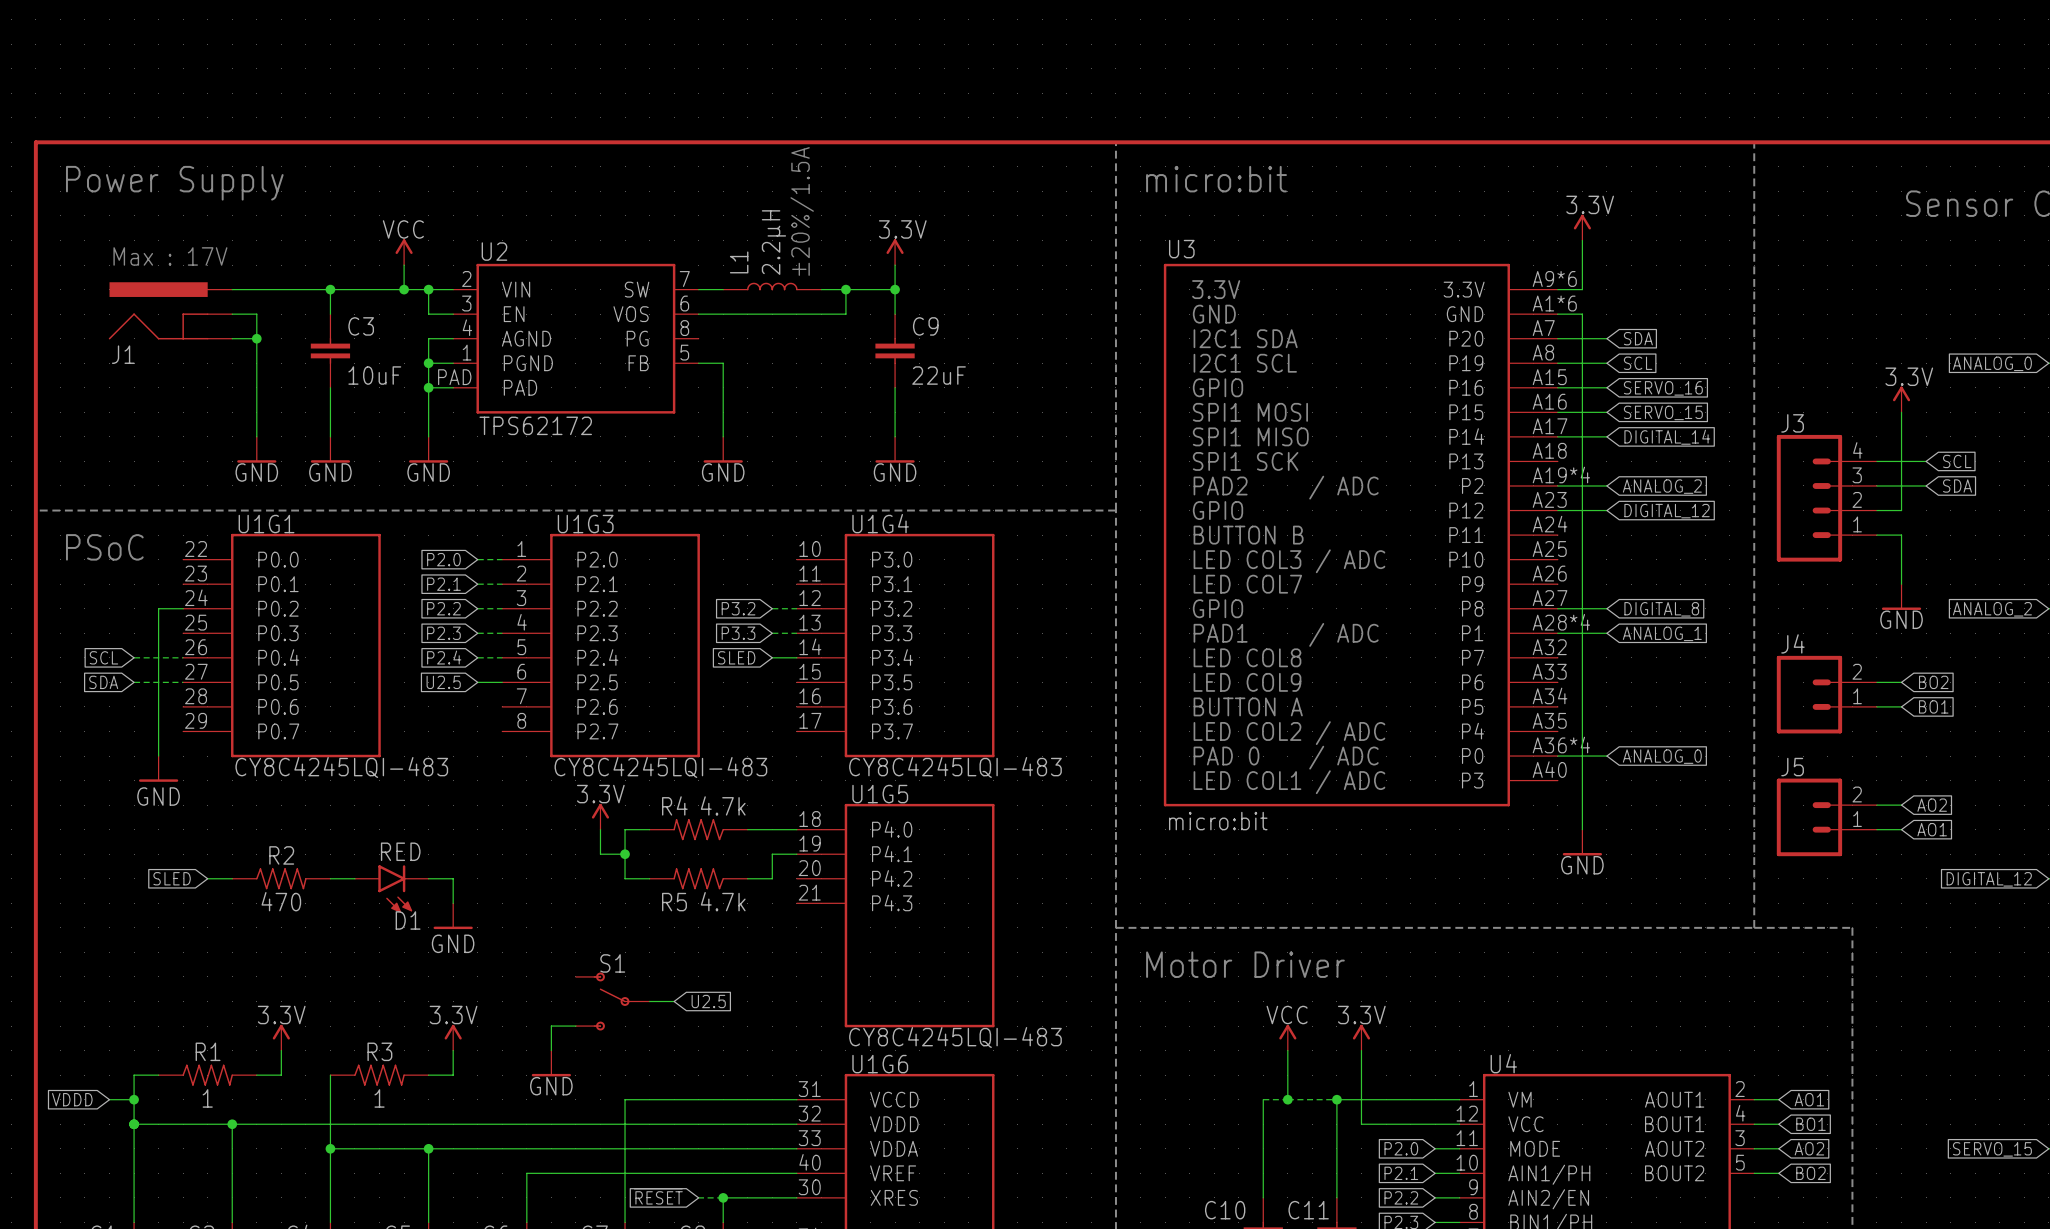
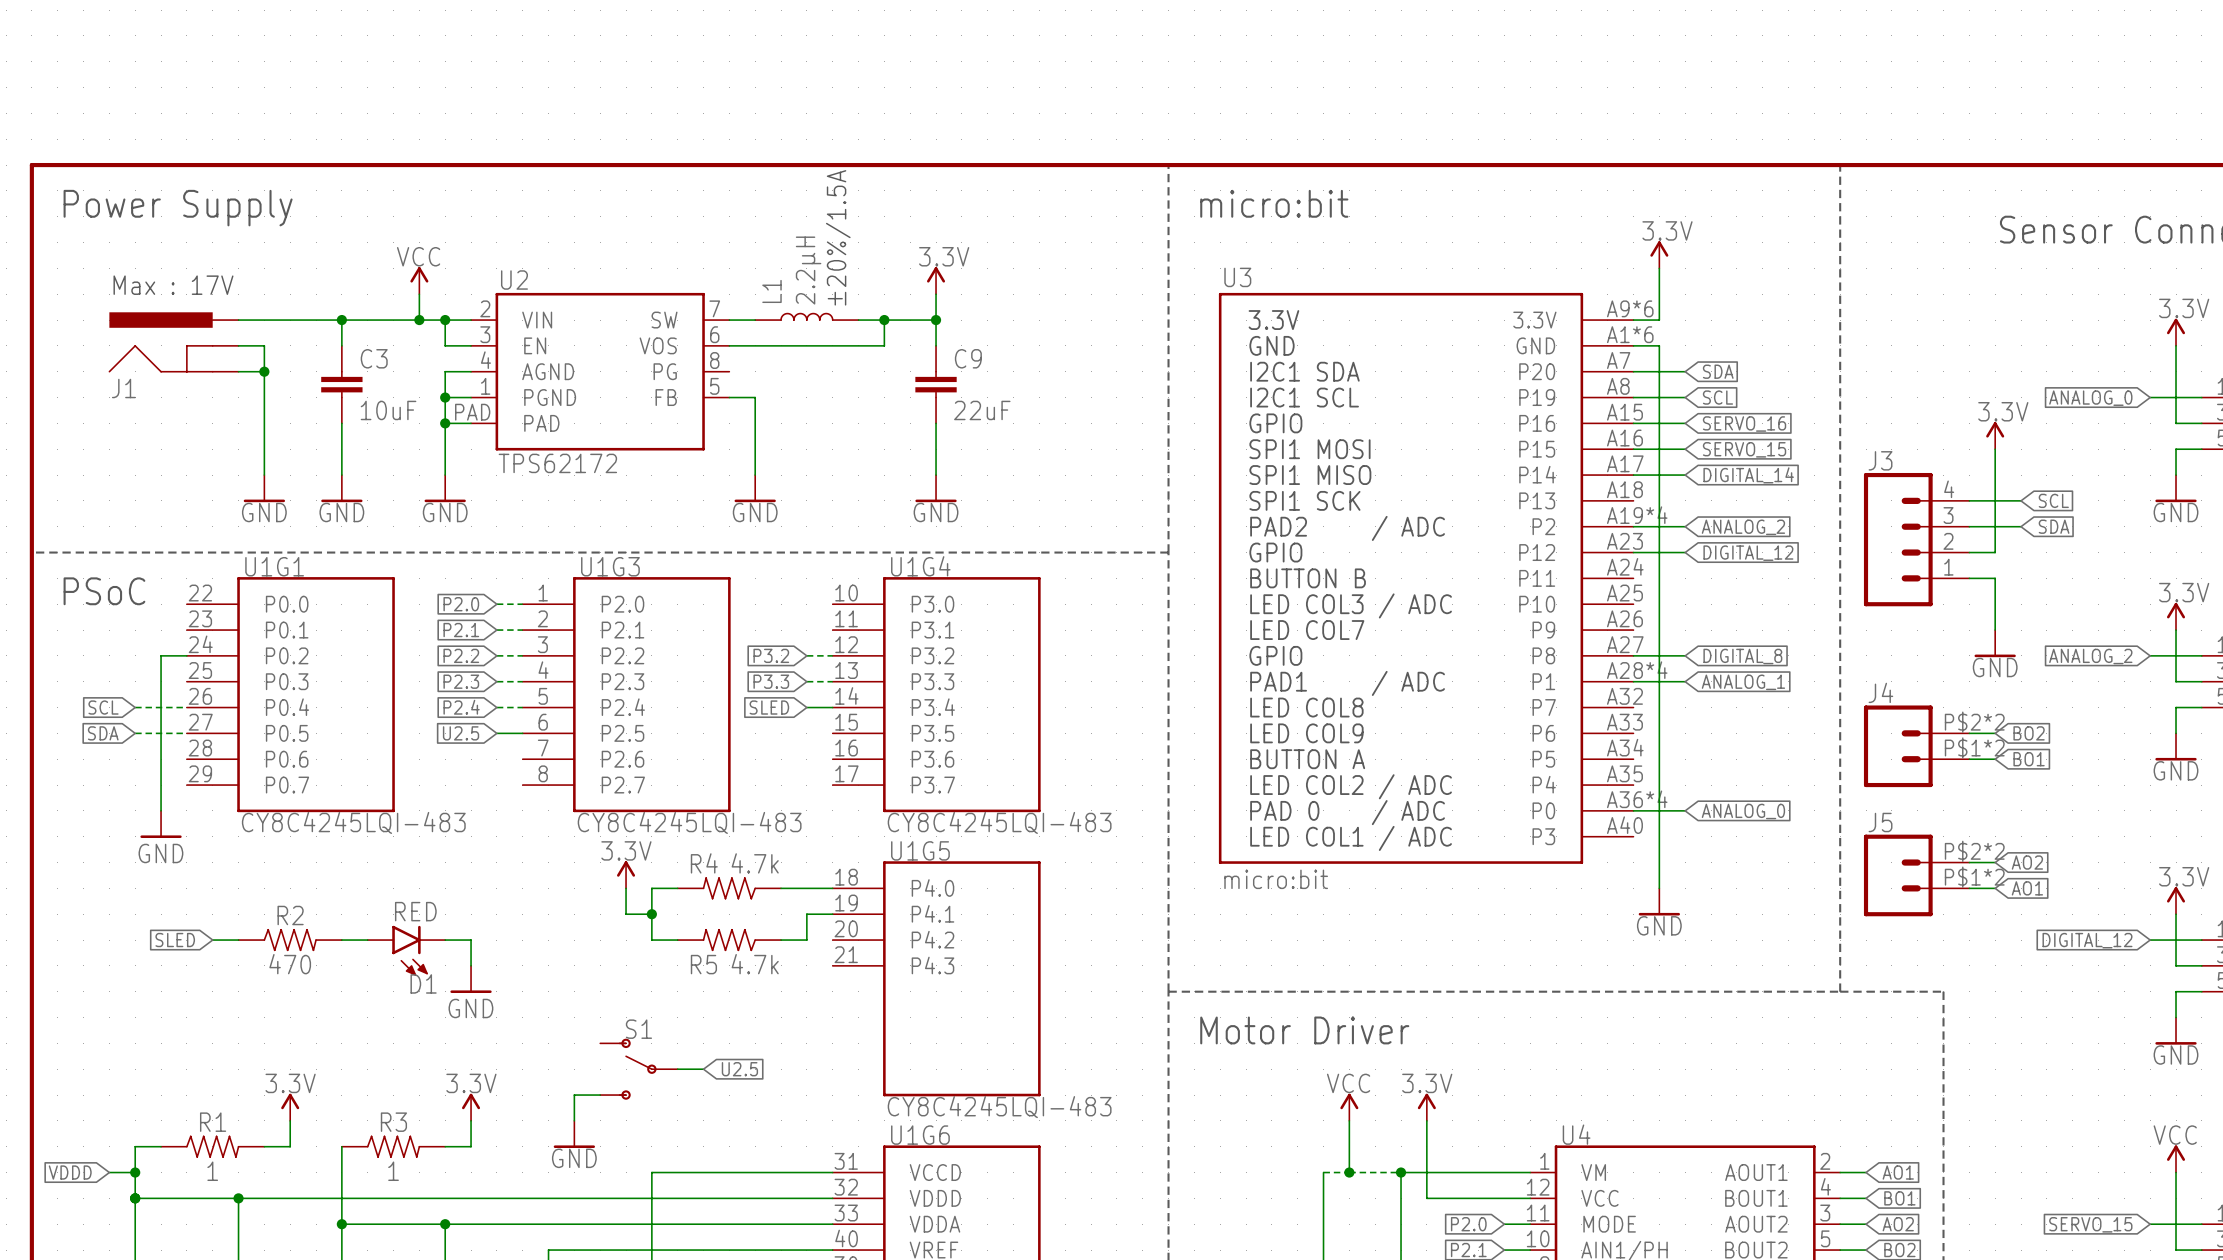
J4 pin number: 2 (1857, 671) -> P$2*2 (1974, 722)
J4 pin number: 1 (1857, 696) -> P$1*2 (1974, 748)
J5 pin number: 2 (1857, 794) -> P$2*2 (1974, 851)
J5 pin number: 1 (1857, 819) -> P$1*2 (1974, 877)

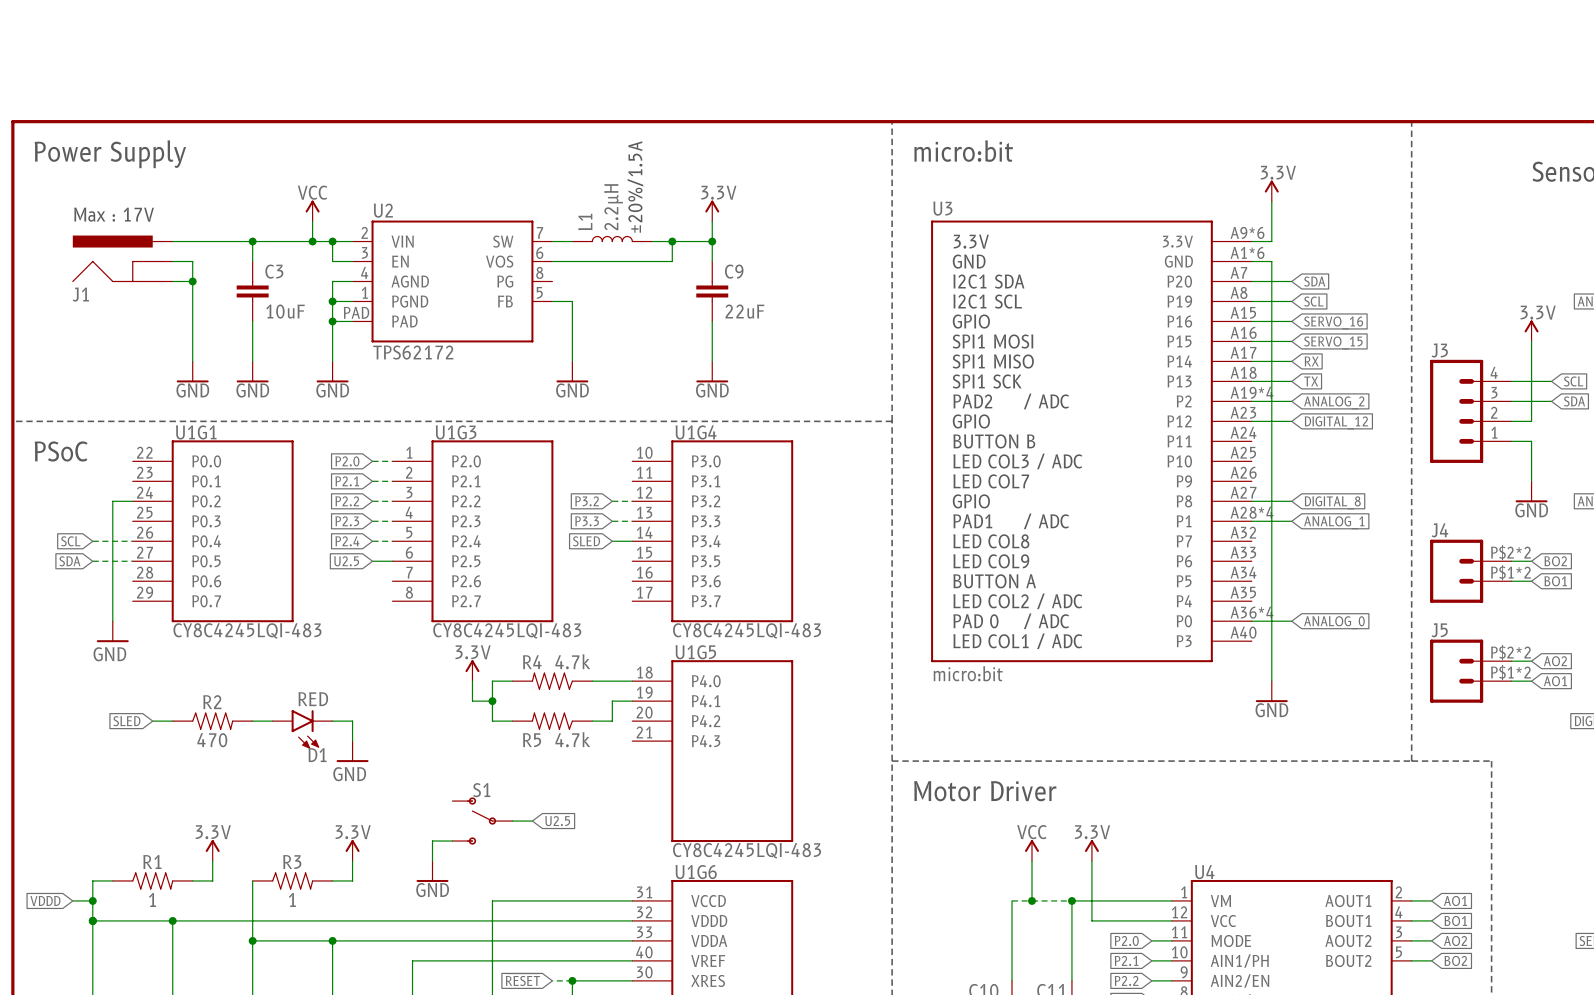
global label: DIGITAL_14 (1748, 475) -> RX (1311, 361)
wire: none -> (1251, 381) (1291, 381)
global label: none -> TX (1311, 381)

